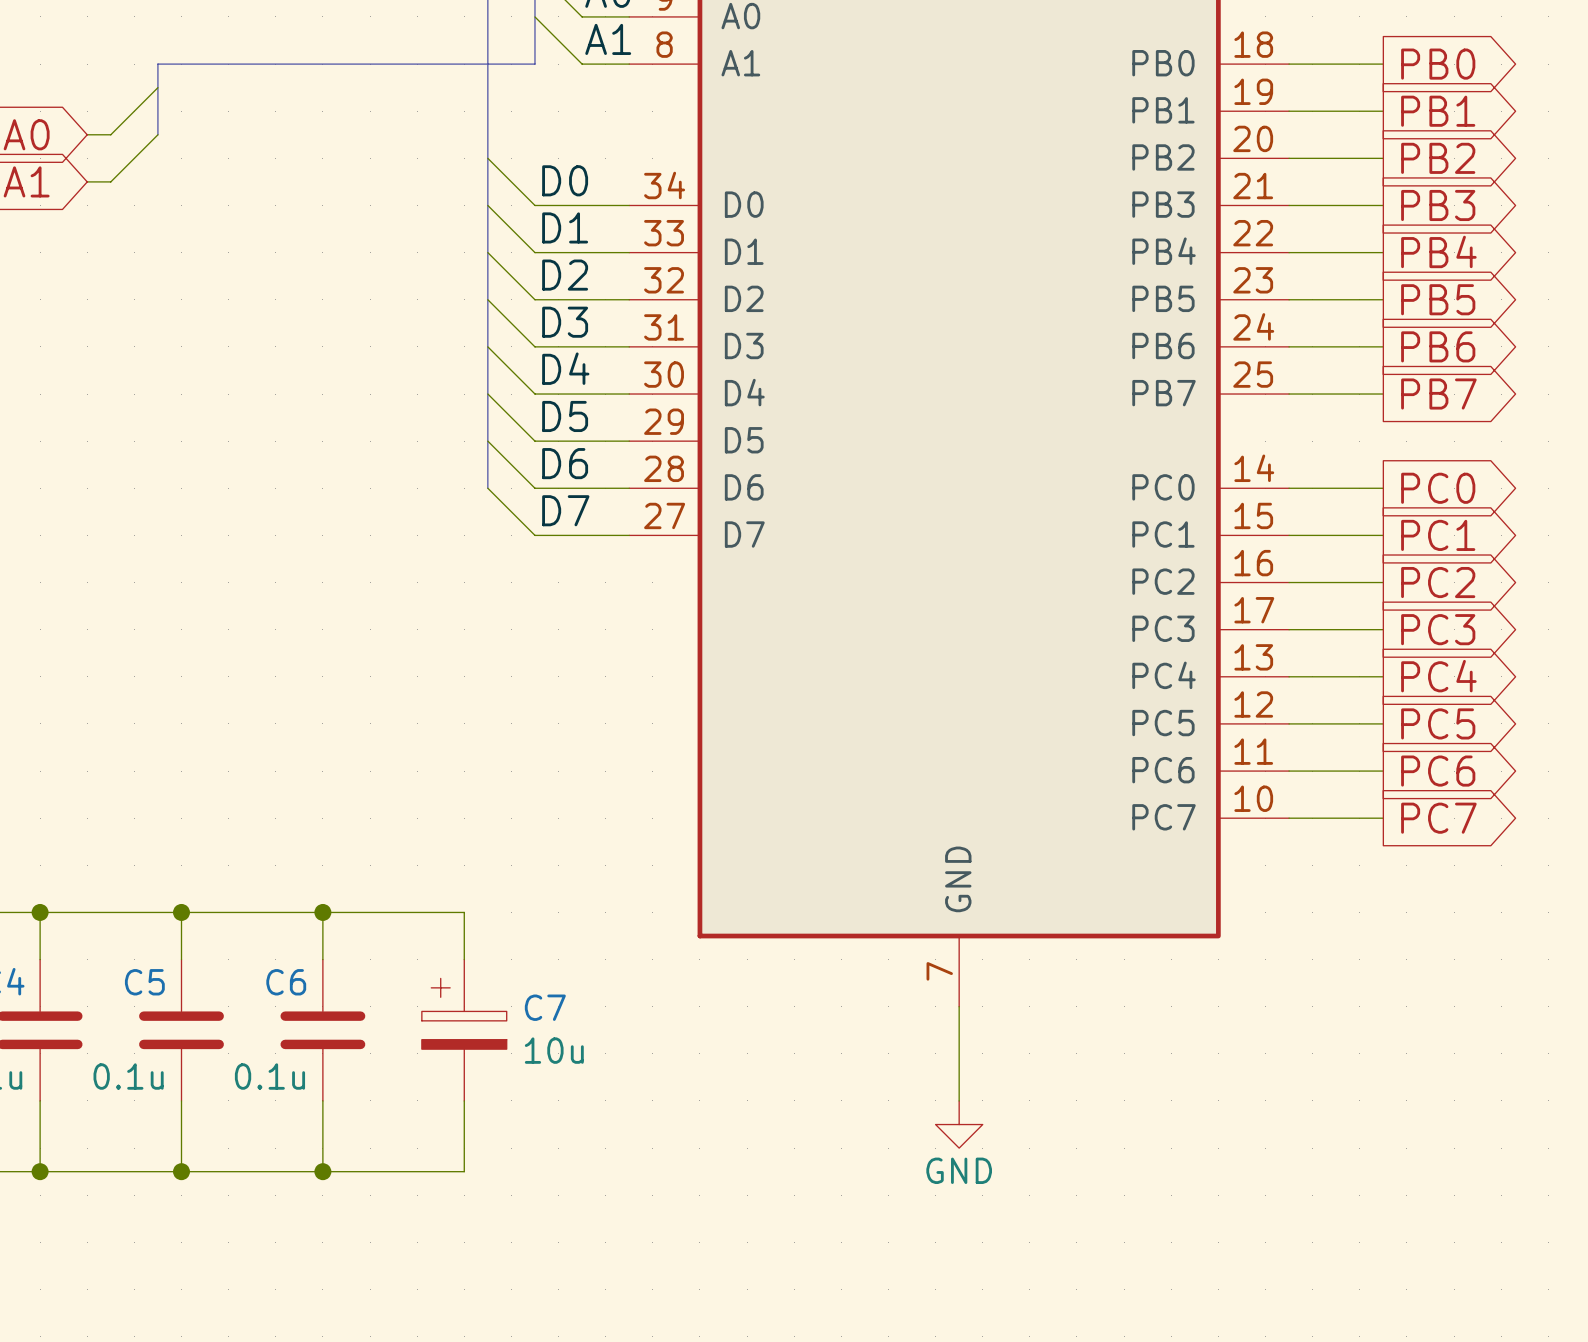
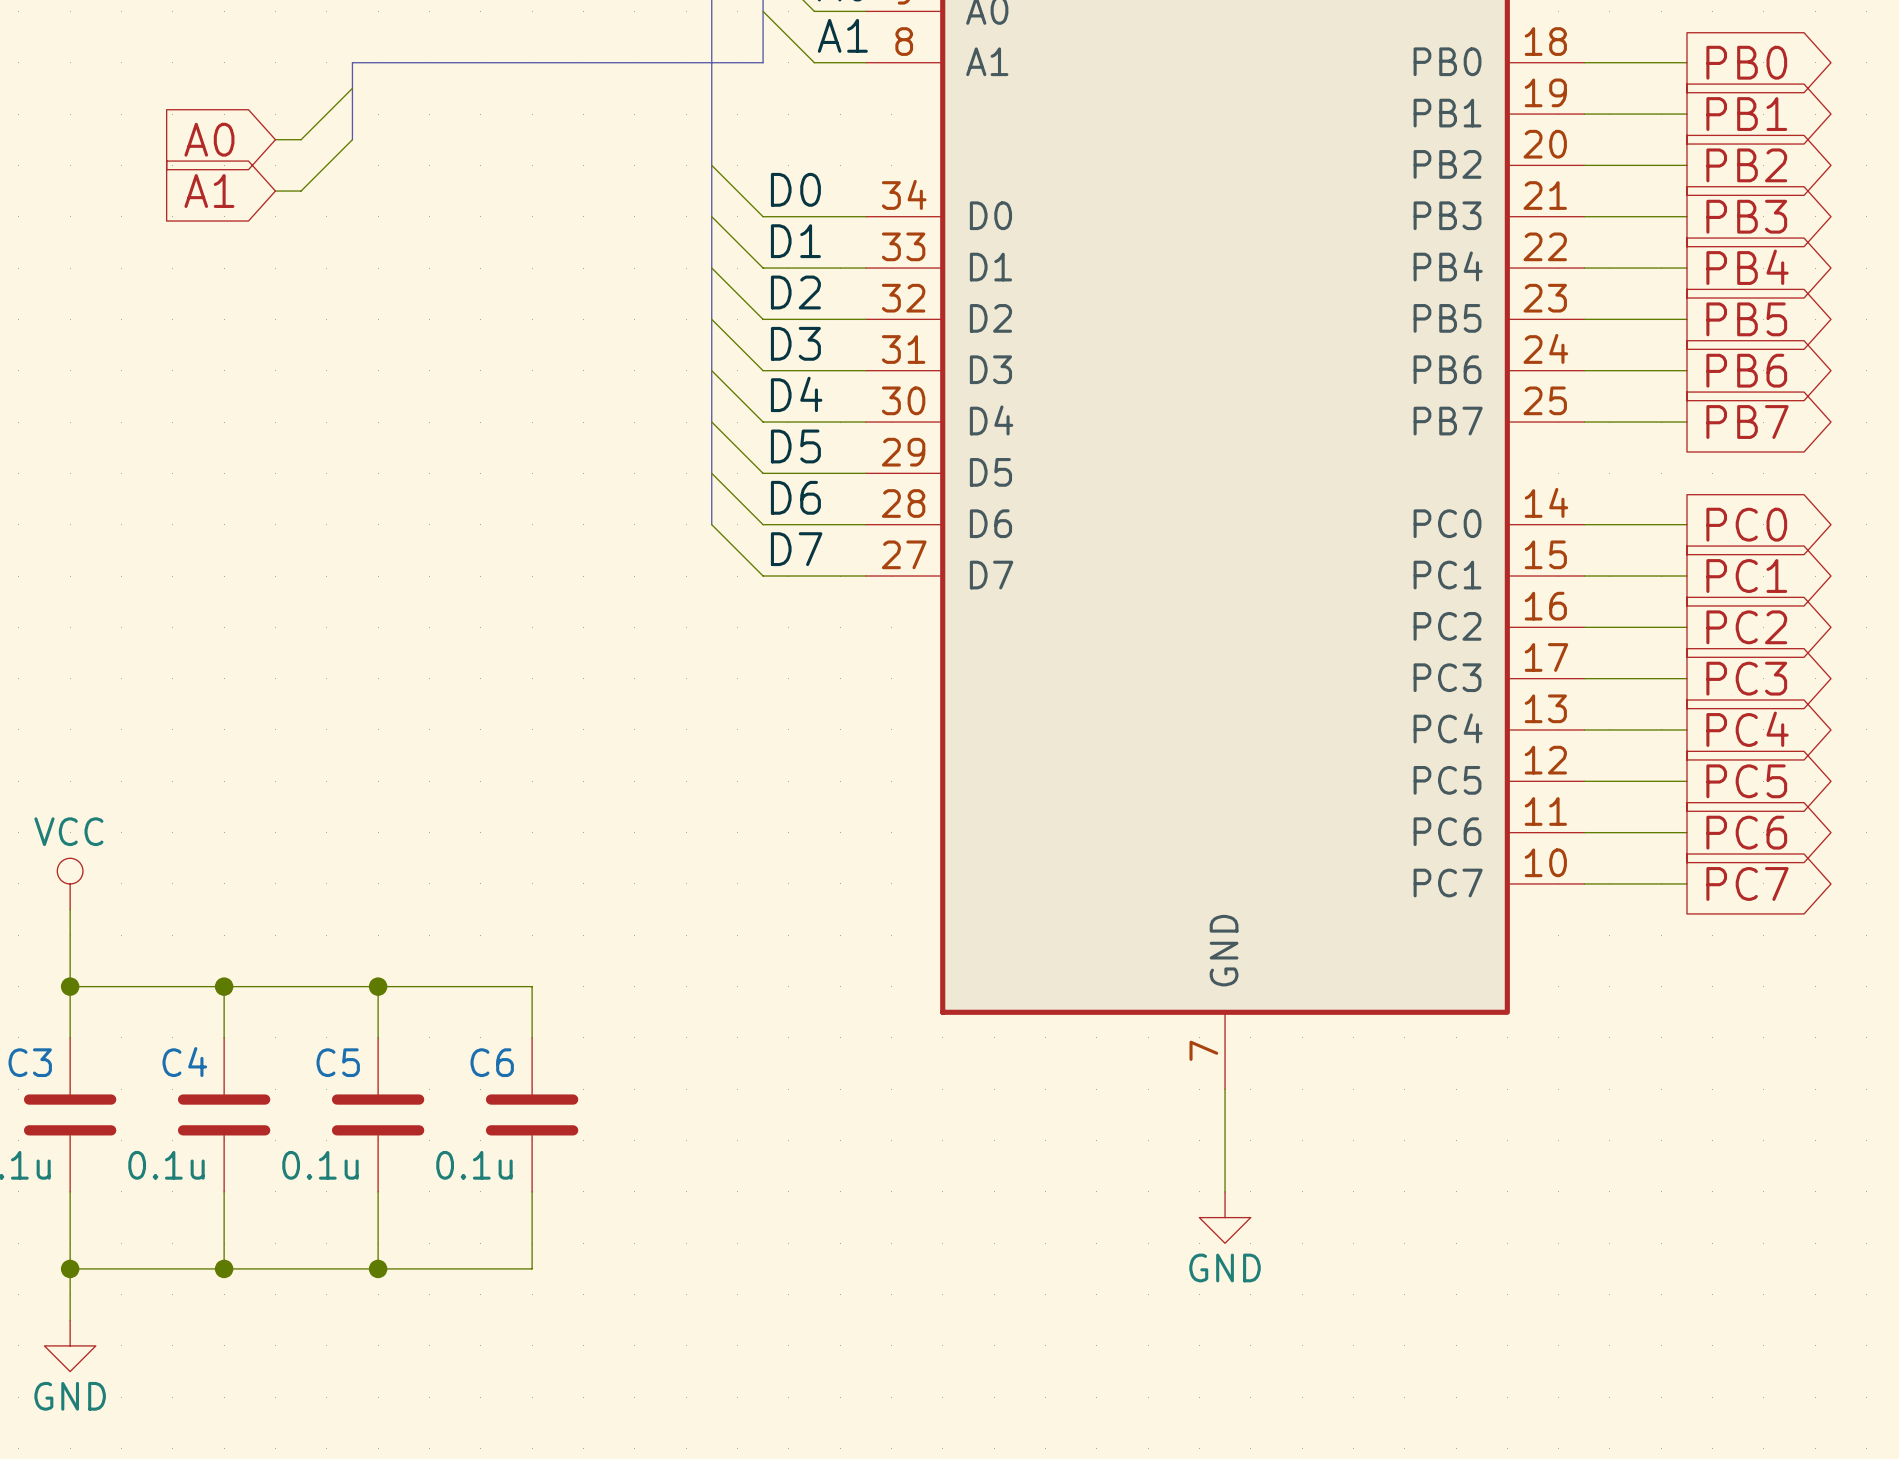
wire: (322, 912) (464, 912) (464, 959) -> none
junction: (322, 912) -> none
C7: 10u (464, 1030) -> none
wire: (464, 1100) (464, 1171) (322, 1171) -> none
junction: (322, 1171) -> none

